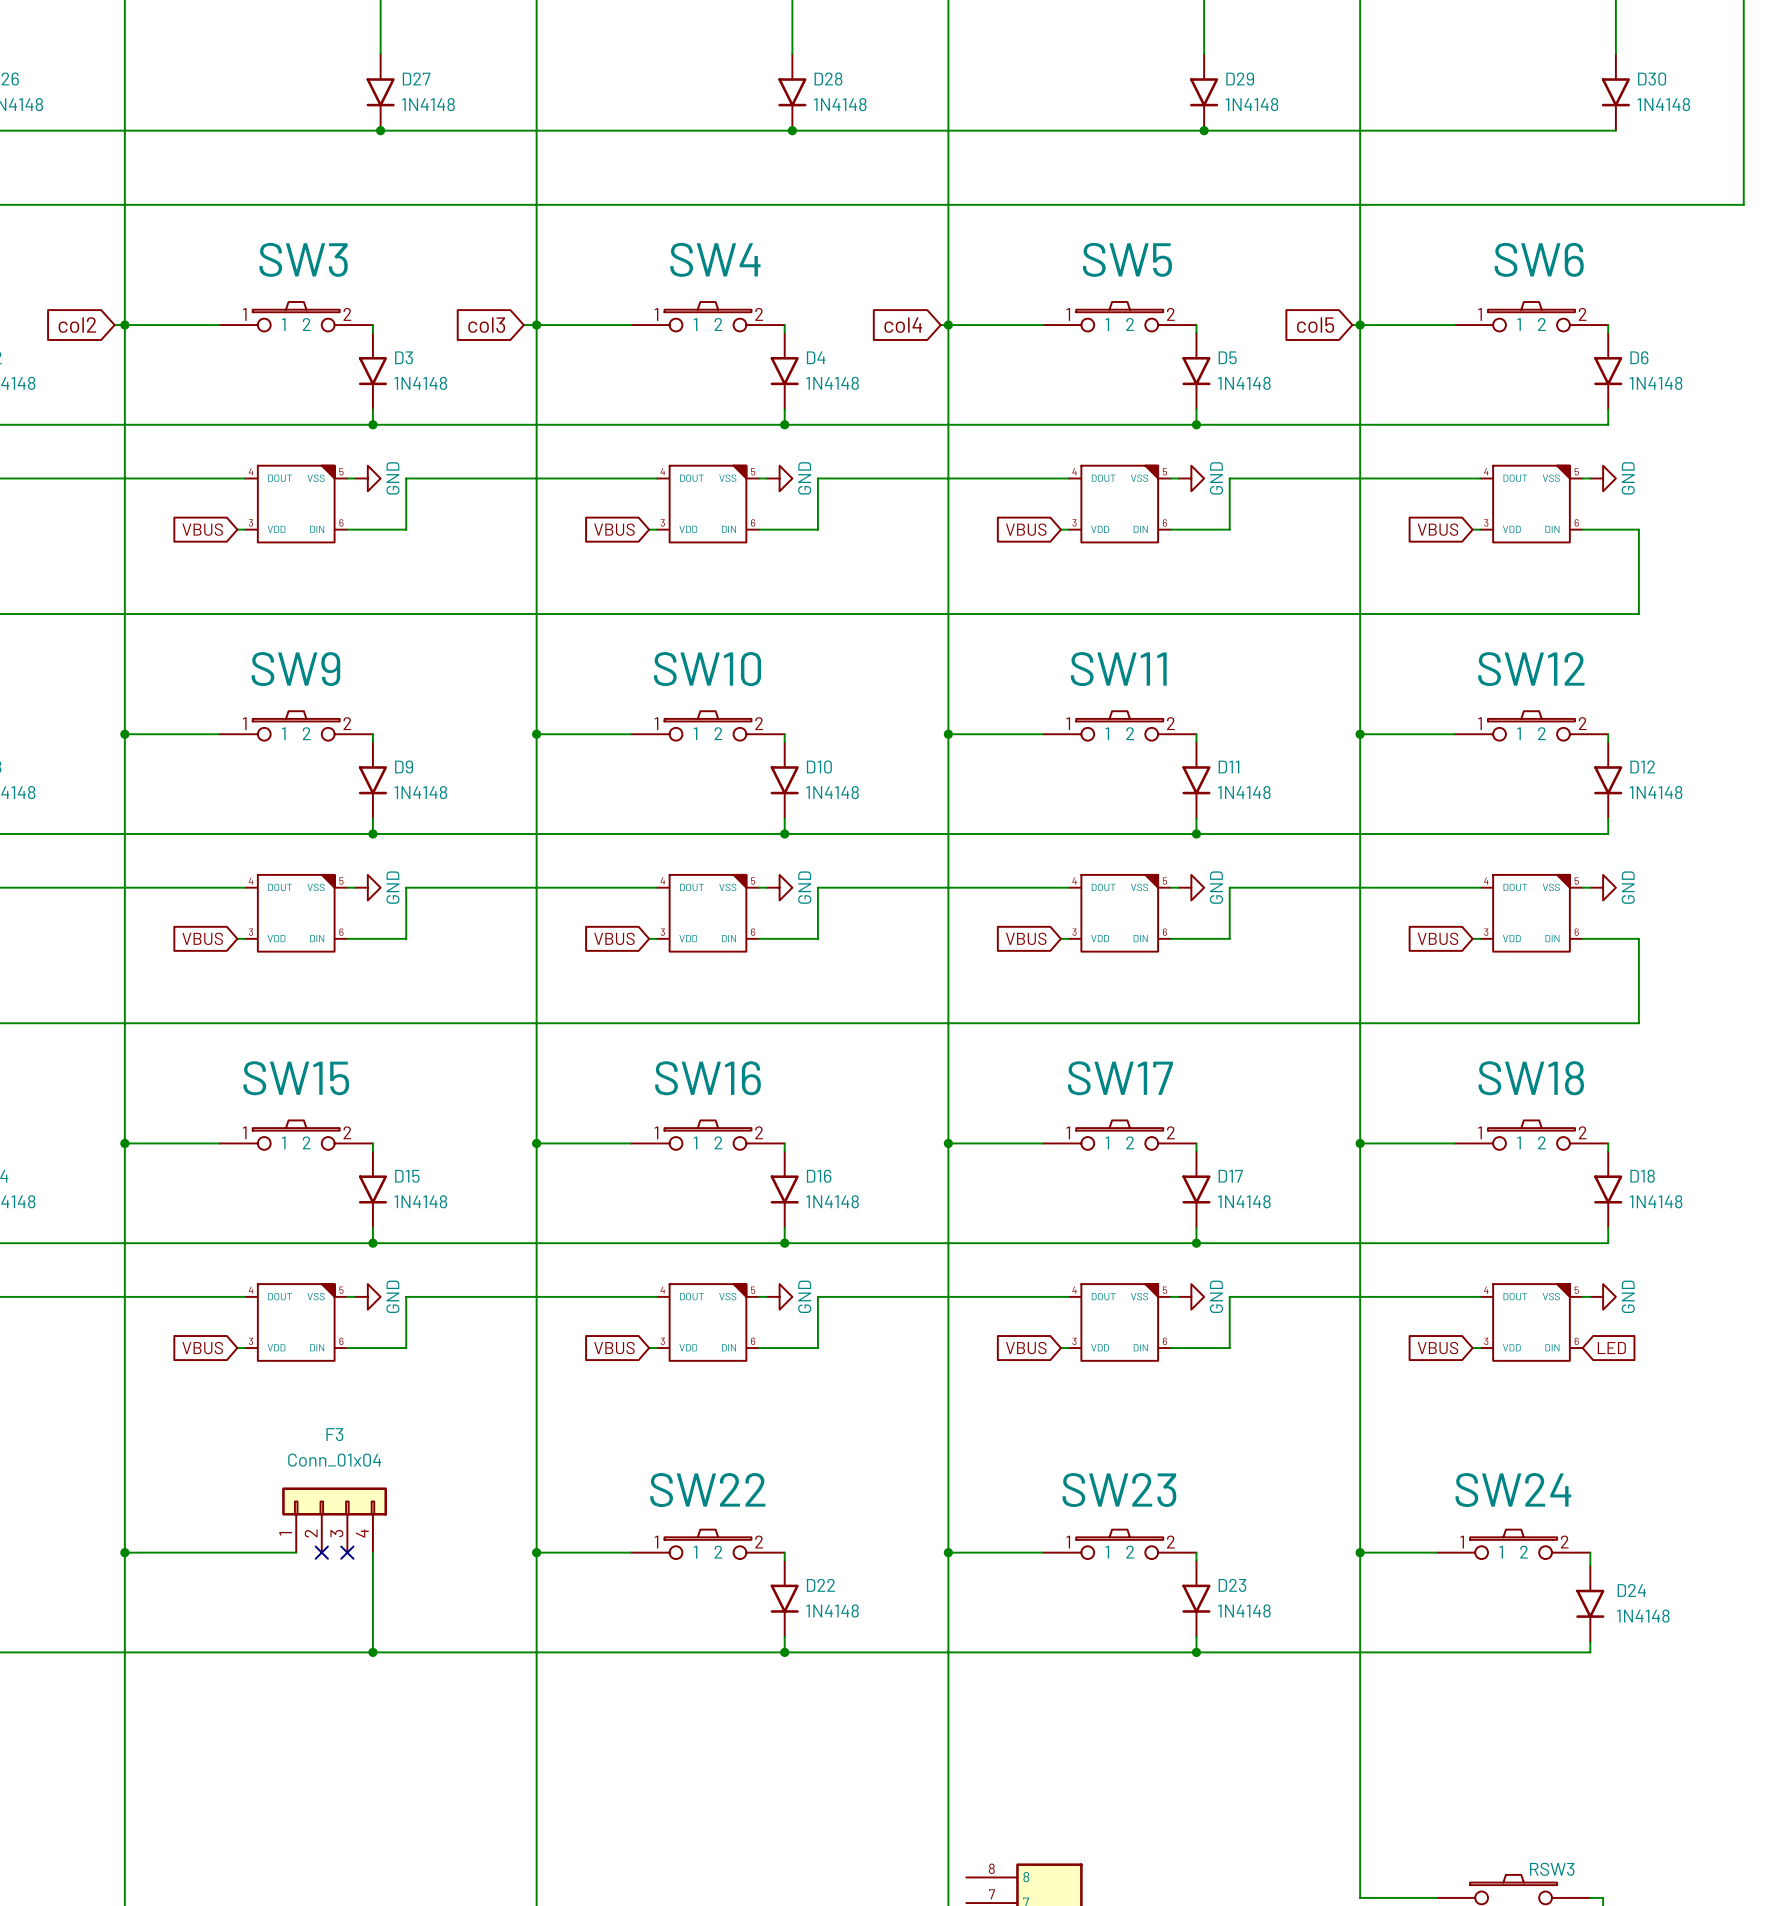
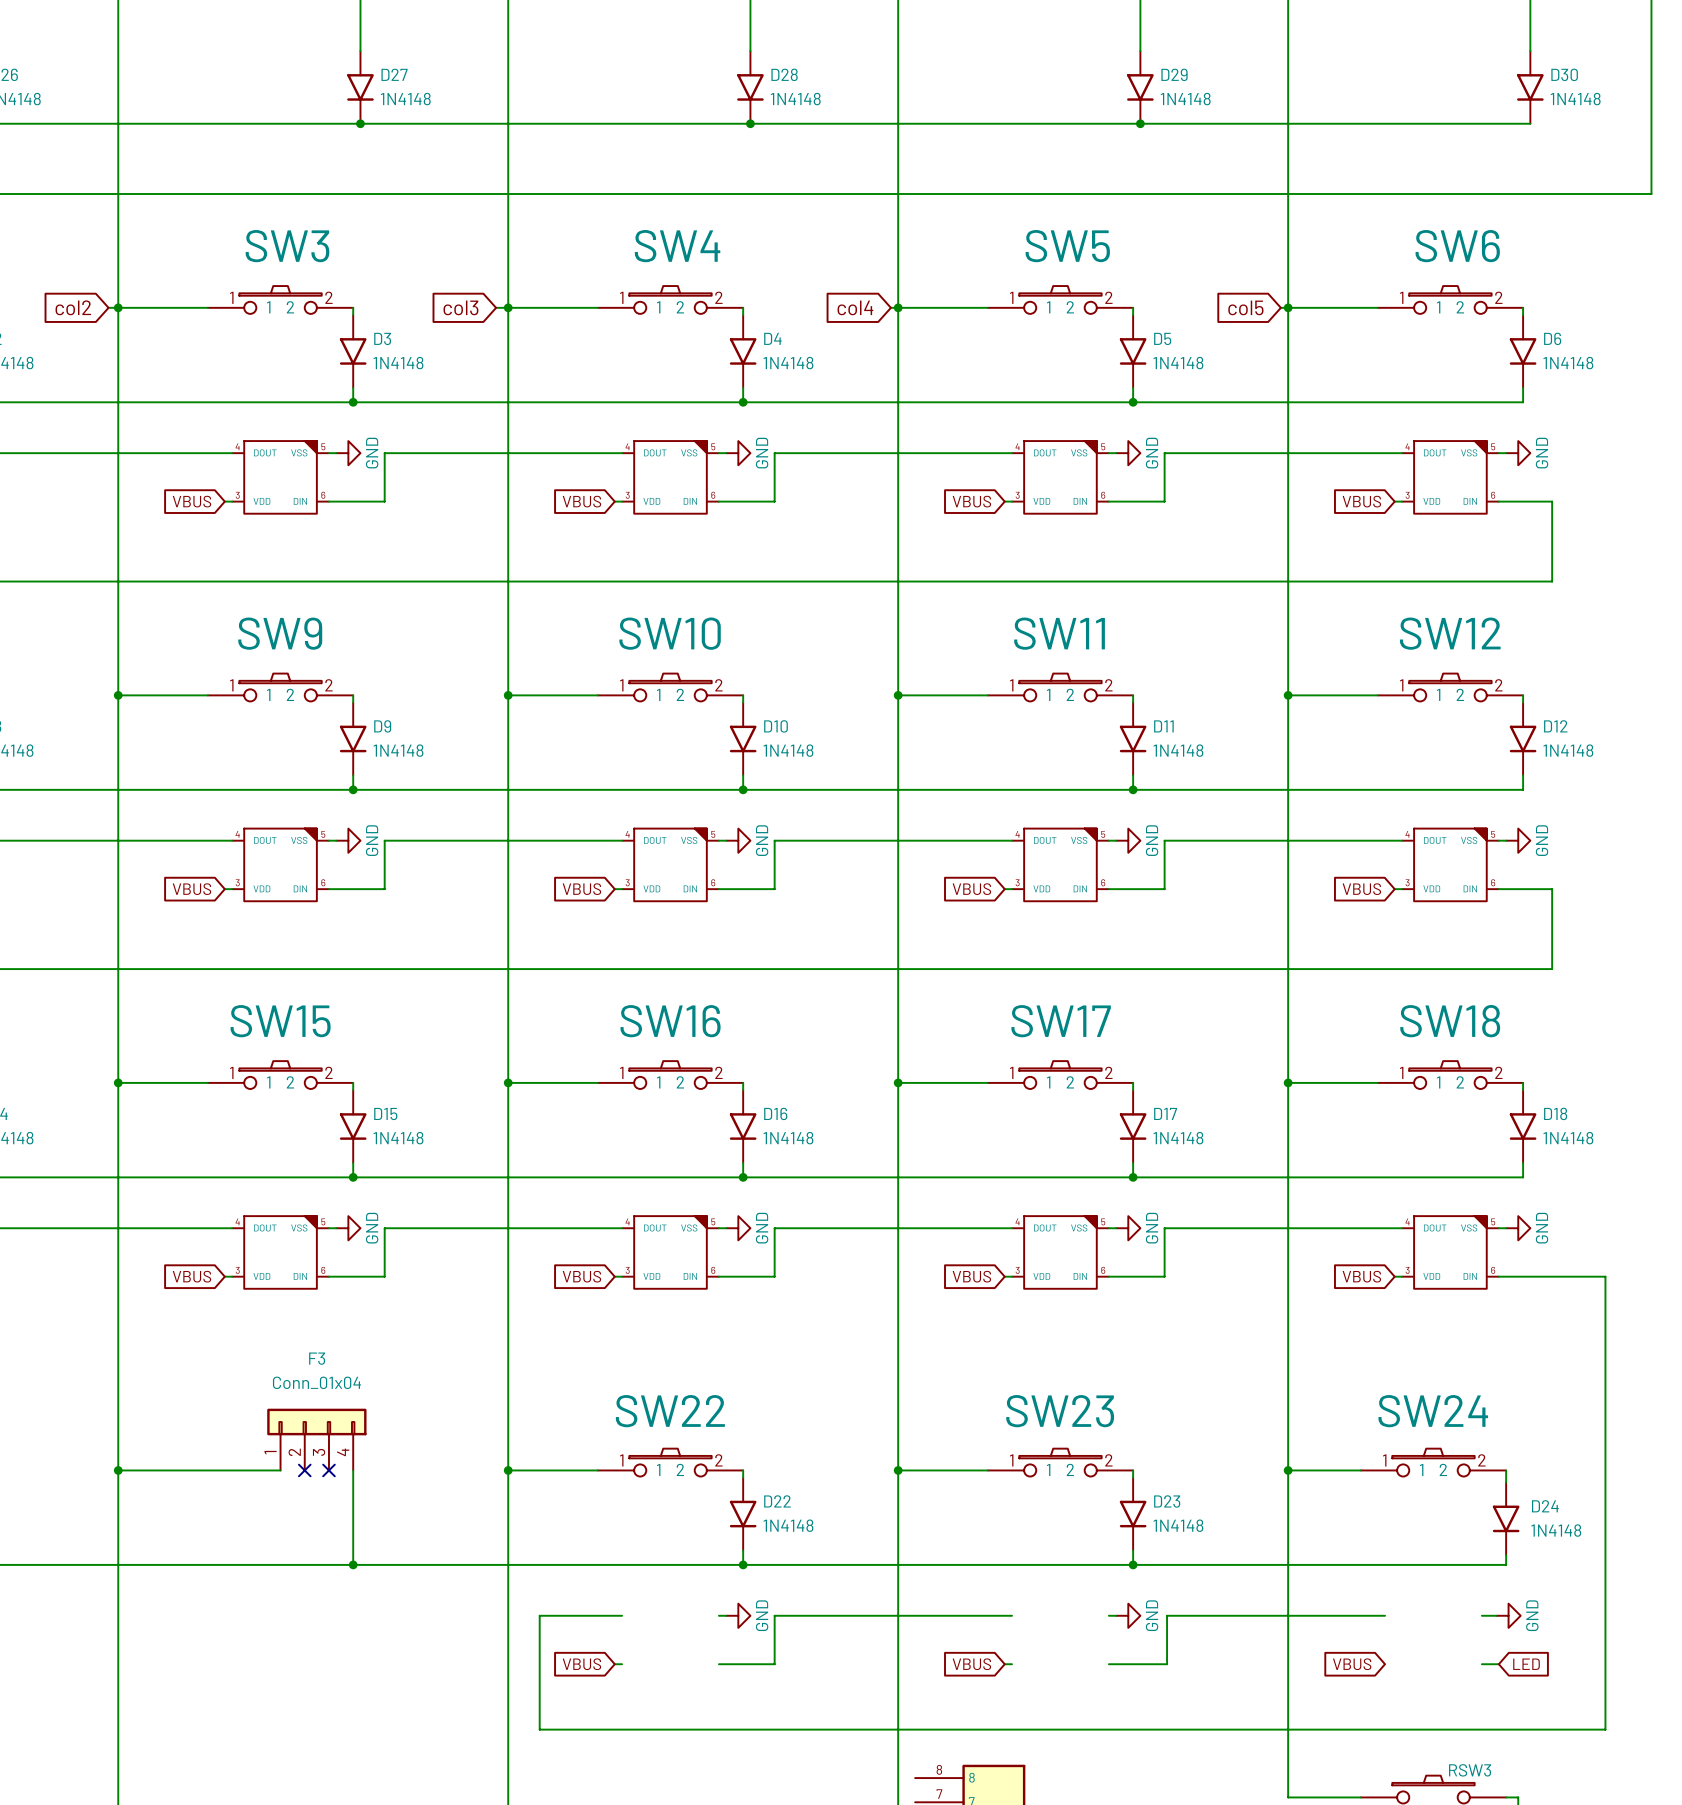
wire: none -> (1498, 1276) (1605, 1276) (1605, 1729) (539, 1729) (539, 1615) (622, 1615)
global label: LED (1611, 1348) -> none
wire: none -> (718, 1615) (726, 1615)
power symbol: none -> GND (738, 1615)
wire: none -> (1012, 1615) (774, 1615) (774, 1664) (718, 1664)
wire: none -> (1108, 1615) (1116, 1615)
power symbol: none -> GND (1128, 1615)
wire: none -> (1385, 1615) (1167, 1615) (1167, 1664) (1108, 1664)
wire: none -> (1481, 1615) (1496, 1615)
power symbol: none -> GND (1508, 1615)
global label: none -> VBUS (581, 1664)
wire: none -> (614, 1664) (622, 1664)
global label: none -> VBUS (971, 1664)
wire: none -> (1004, 1664) (1012, 1664)
global label: none -> VBUS (1352, 1664)
wire: none -> (1481, 1664) (1498, 1664)
global label: none -> LED (1526, 1664)

